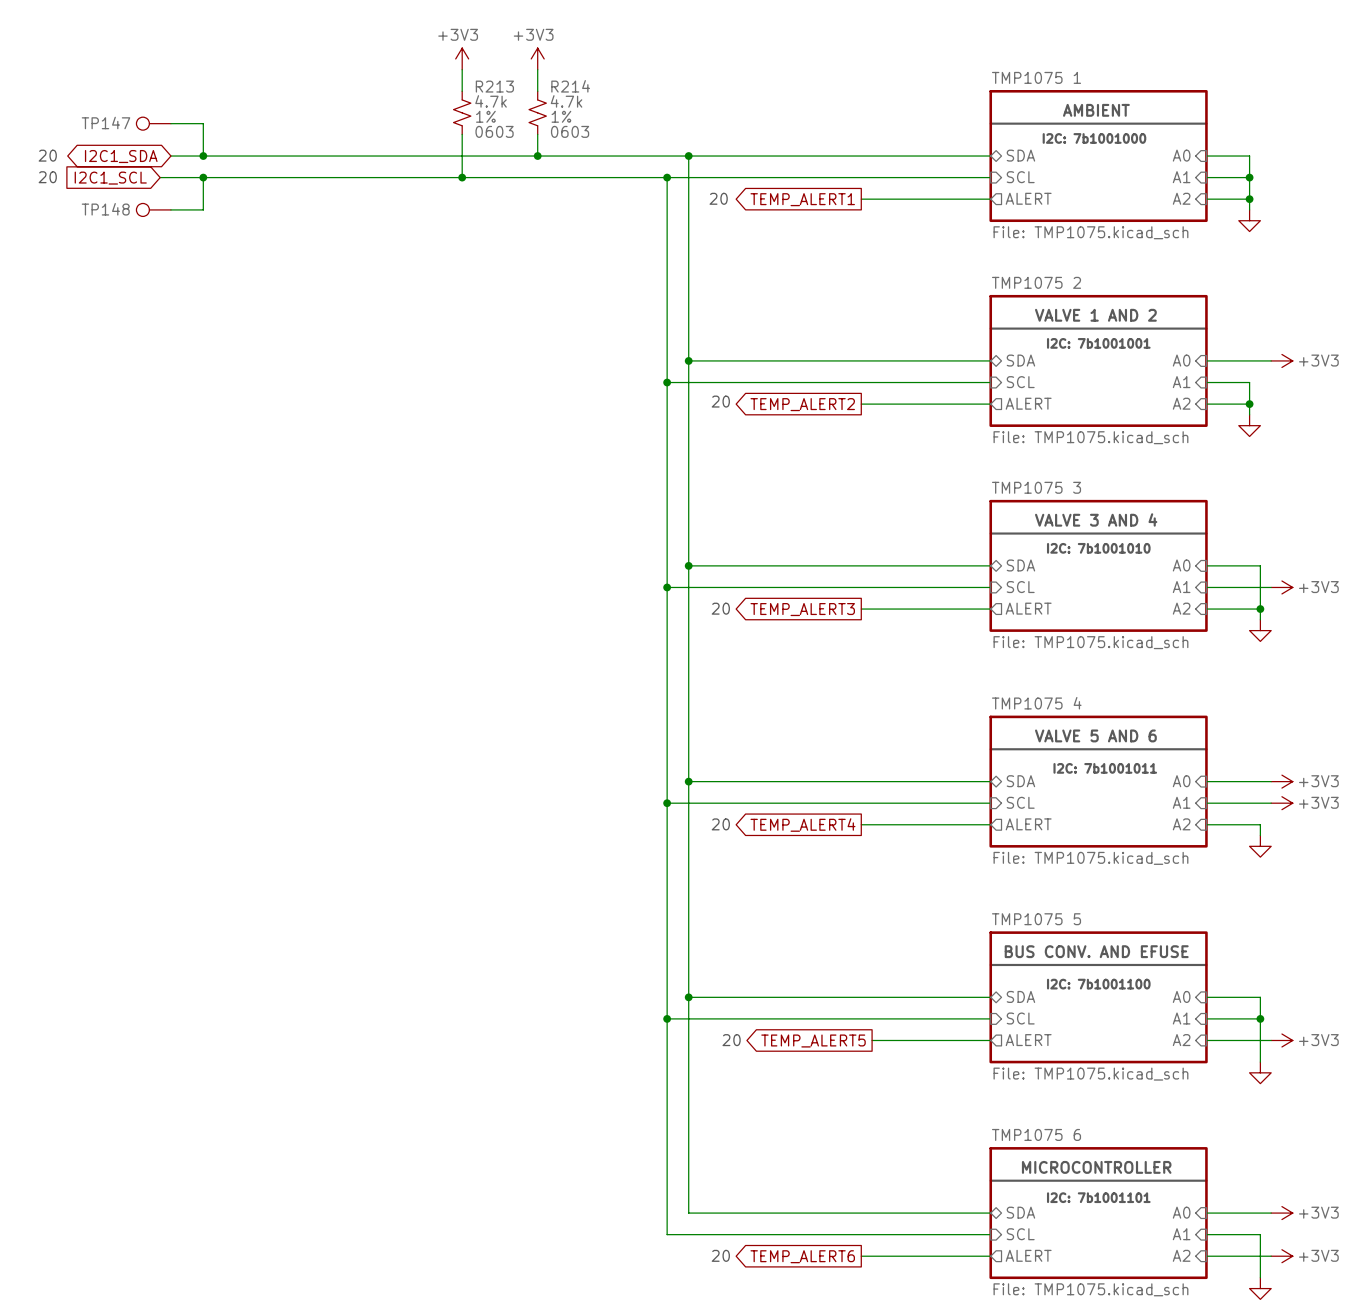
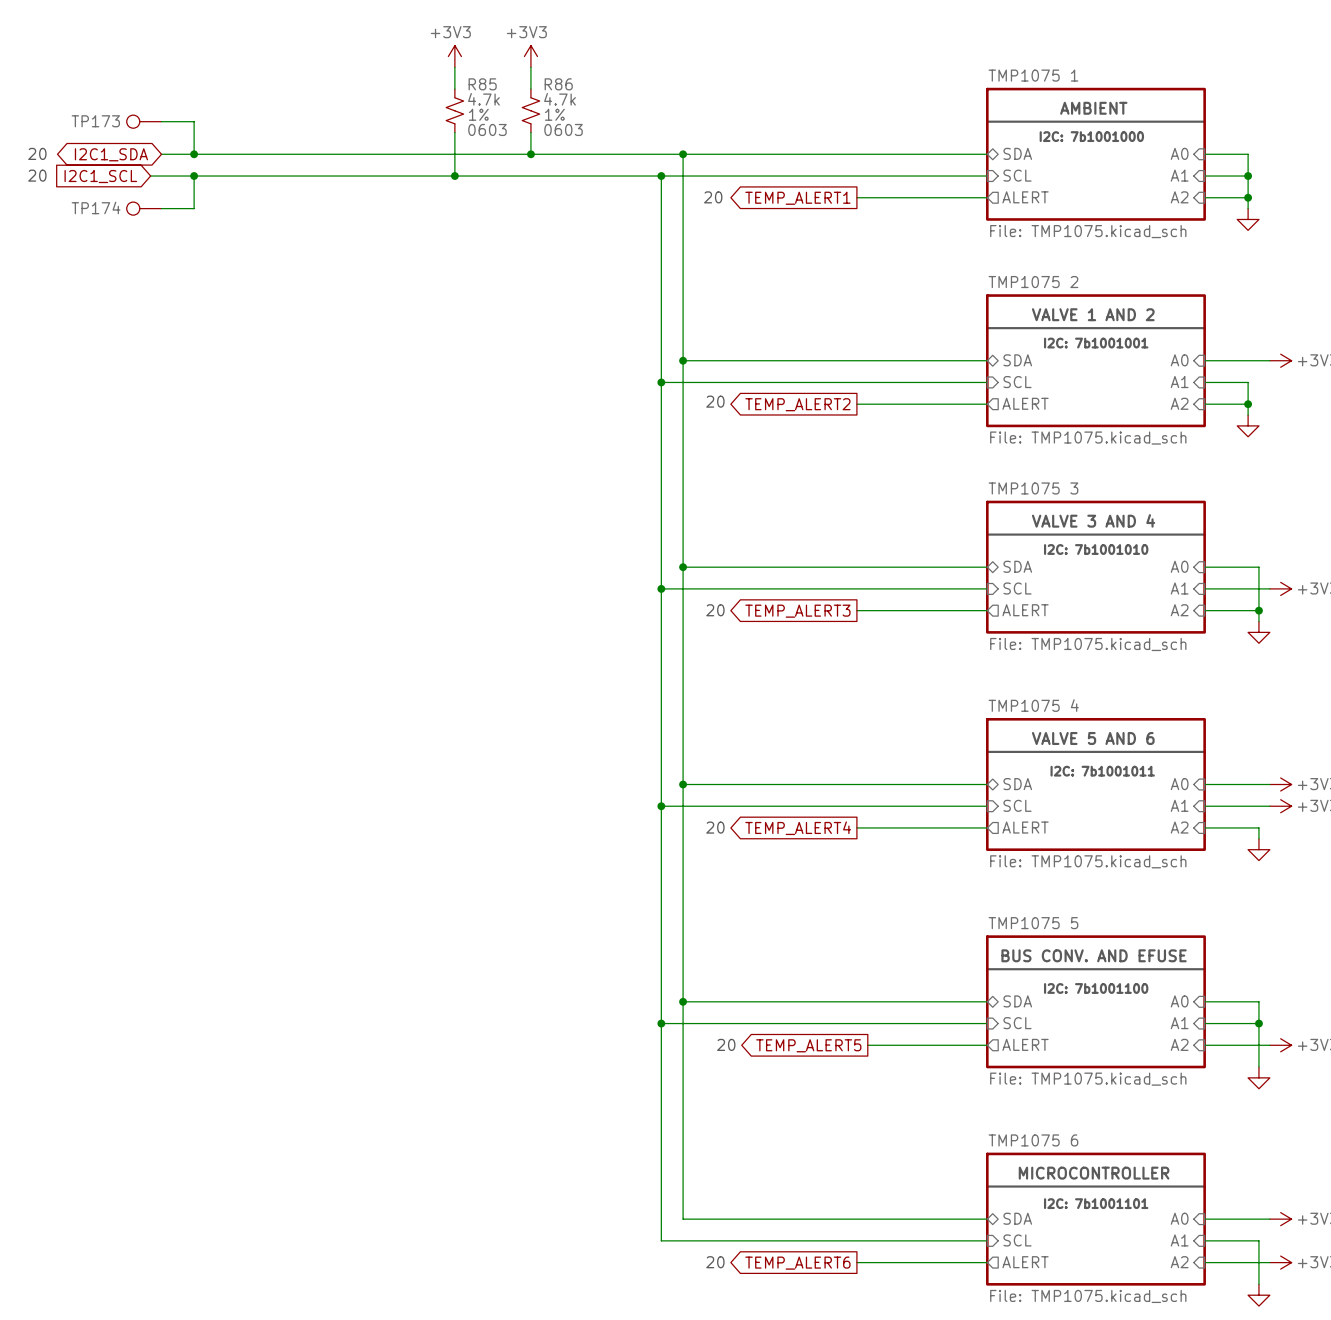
R213 name: R213 (494, 86) -> R85 (482, 84)
R214 name: R214 (570, 86) -> R86 (558, 84)
TP147 name: TP147 (105, 122) -> TP173 (95, 121)
TP148 name: TP148 (105, 209) -> TP174 (96, 207)

